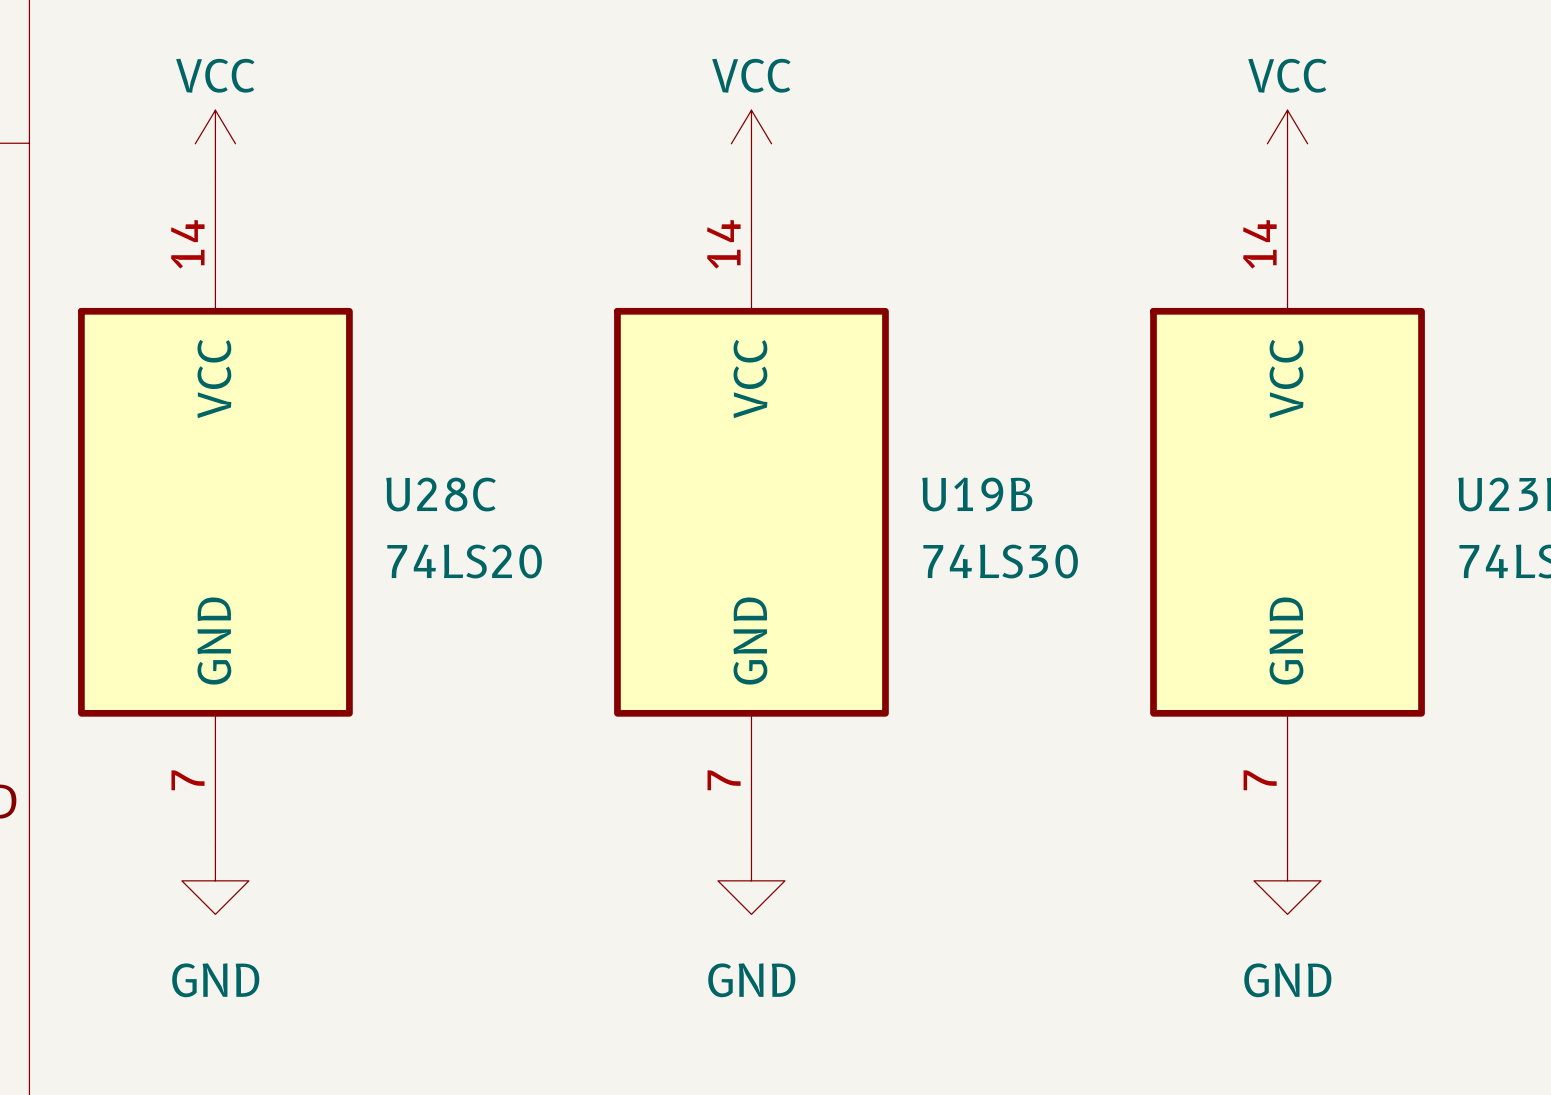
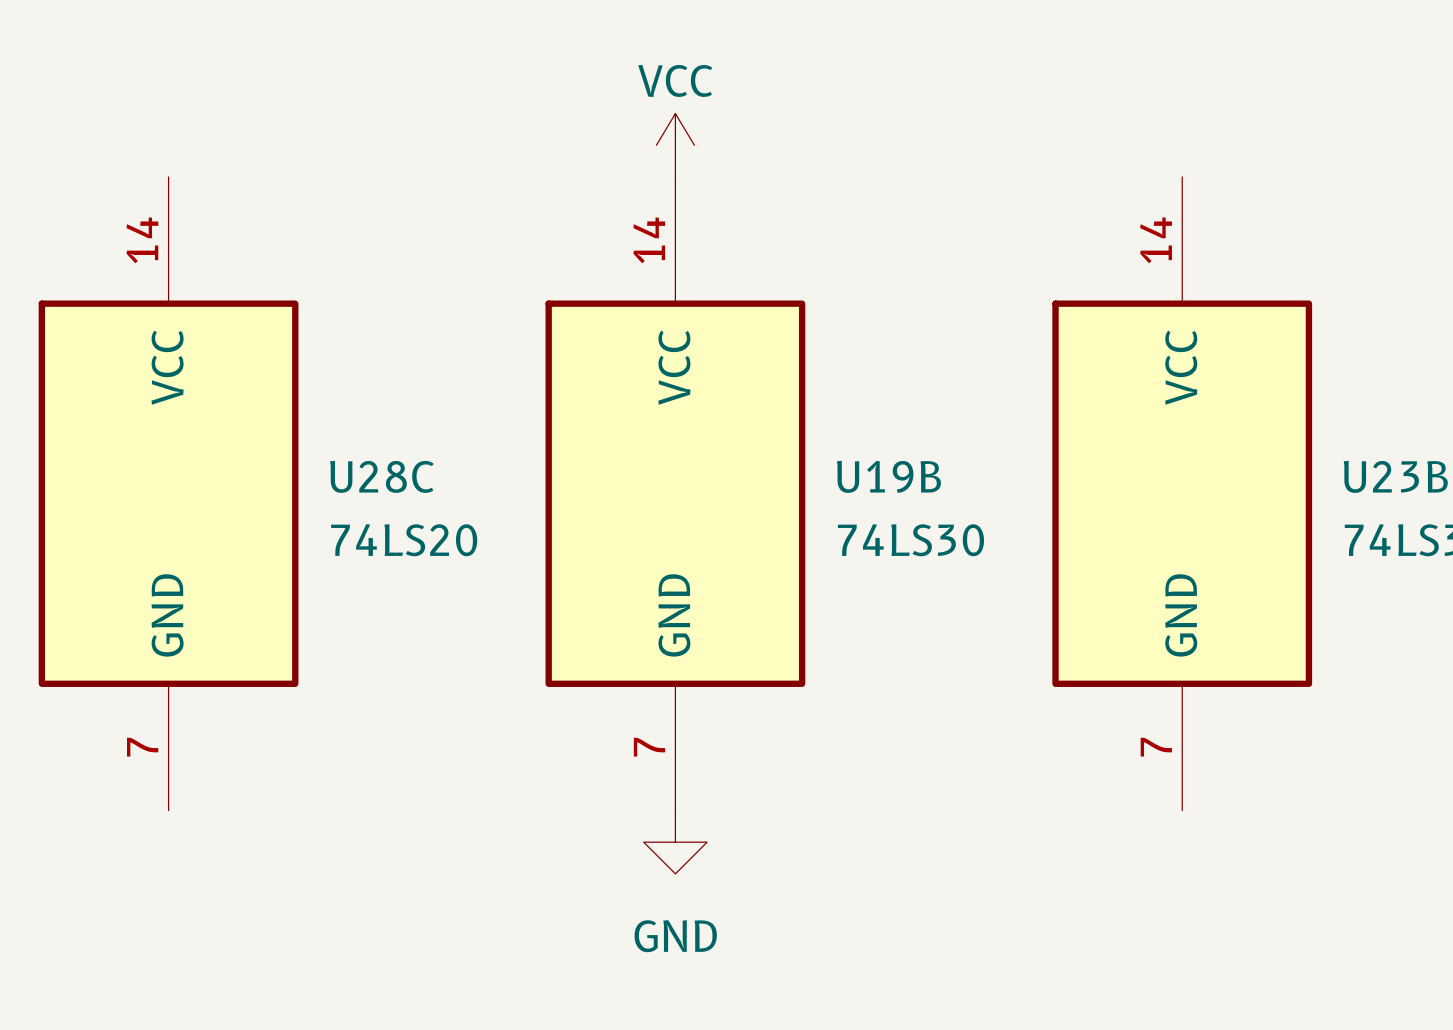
power symbol: VCC (215, 143) -> none
power symbol: VCC (1287, 143) -> none
power symbol: GND (215, 880) -> none
power symbol: GND (1287, 880) -> none

